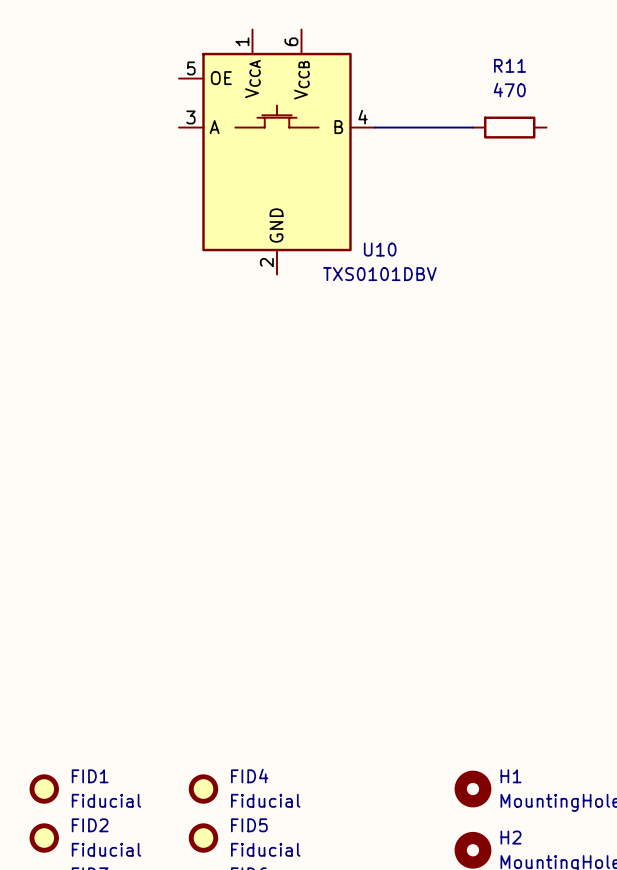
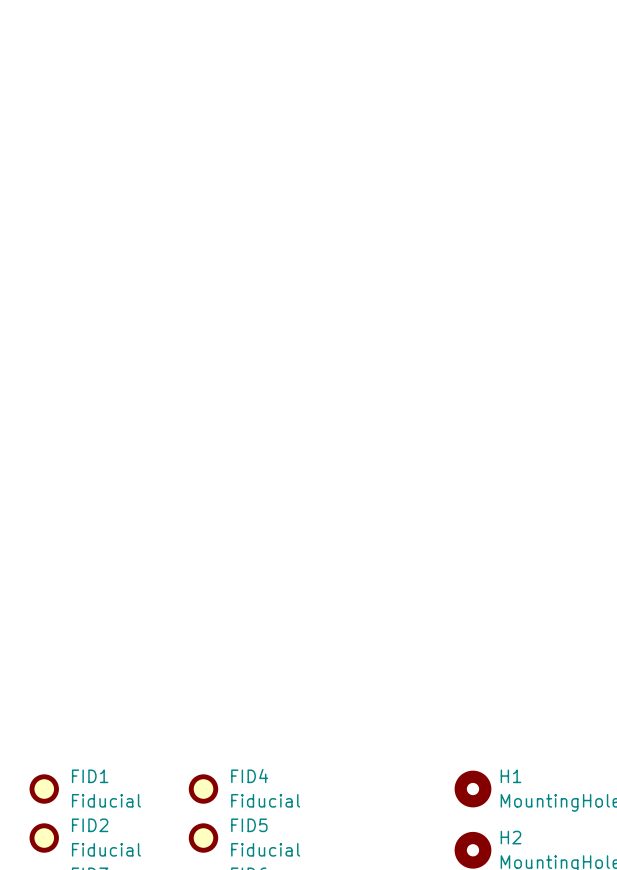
wire: (374, 127) (472, 127) -> none
R11: 470 (509, 127) -> none
U10: TXS0101DBV (276, 152) -> none

